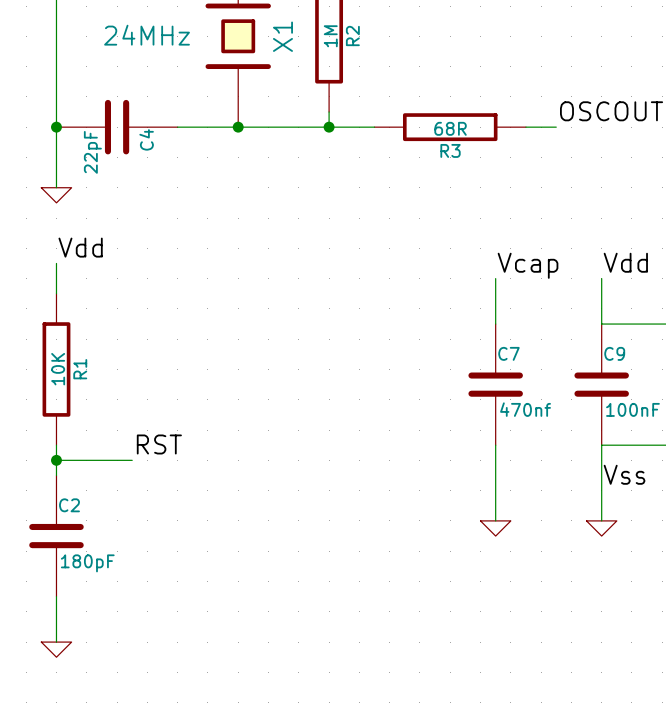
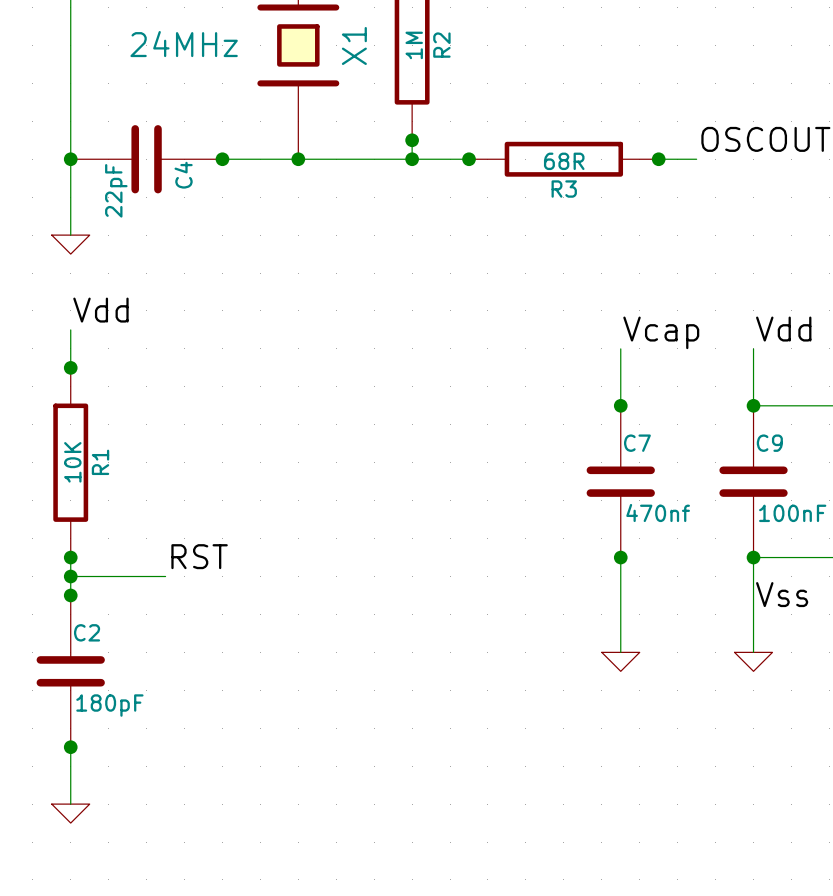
junction: none -> (412, 140)
junction: none -> (222, 159)
junction: none -> (469, 159)
junction: none -> (658, 159)
junction: none -> (70, 367)
junction: none -> (620, 405)
junction: none -> (753, 405)
junction: none -> (70, 557)
junction: none -> (620, 557)
junction: none -> (753, 557)
junction: none -> (70, 595)
junction: none -> (70, 747)

